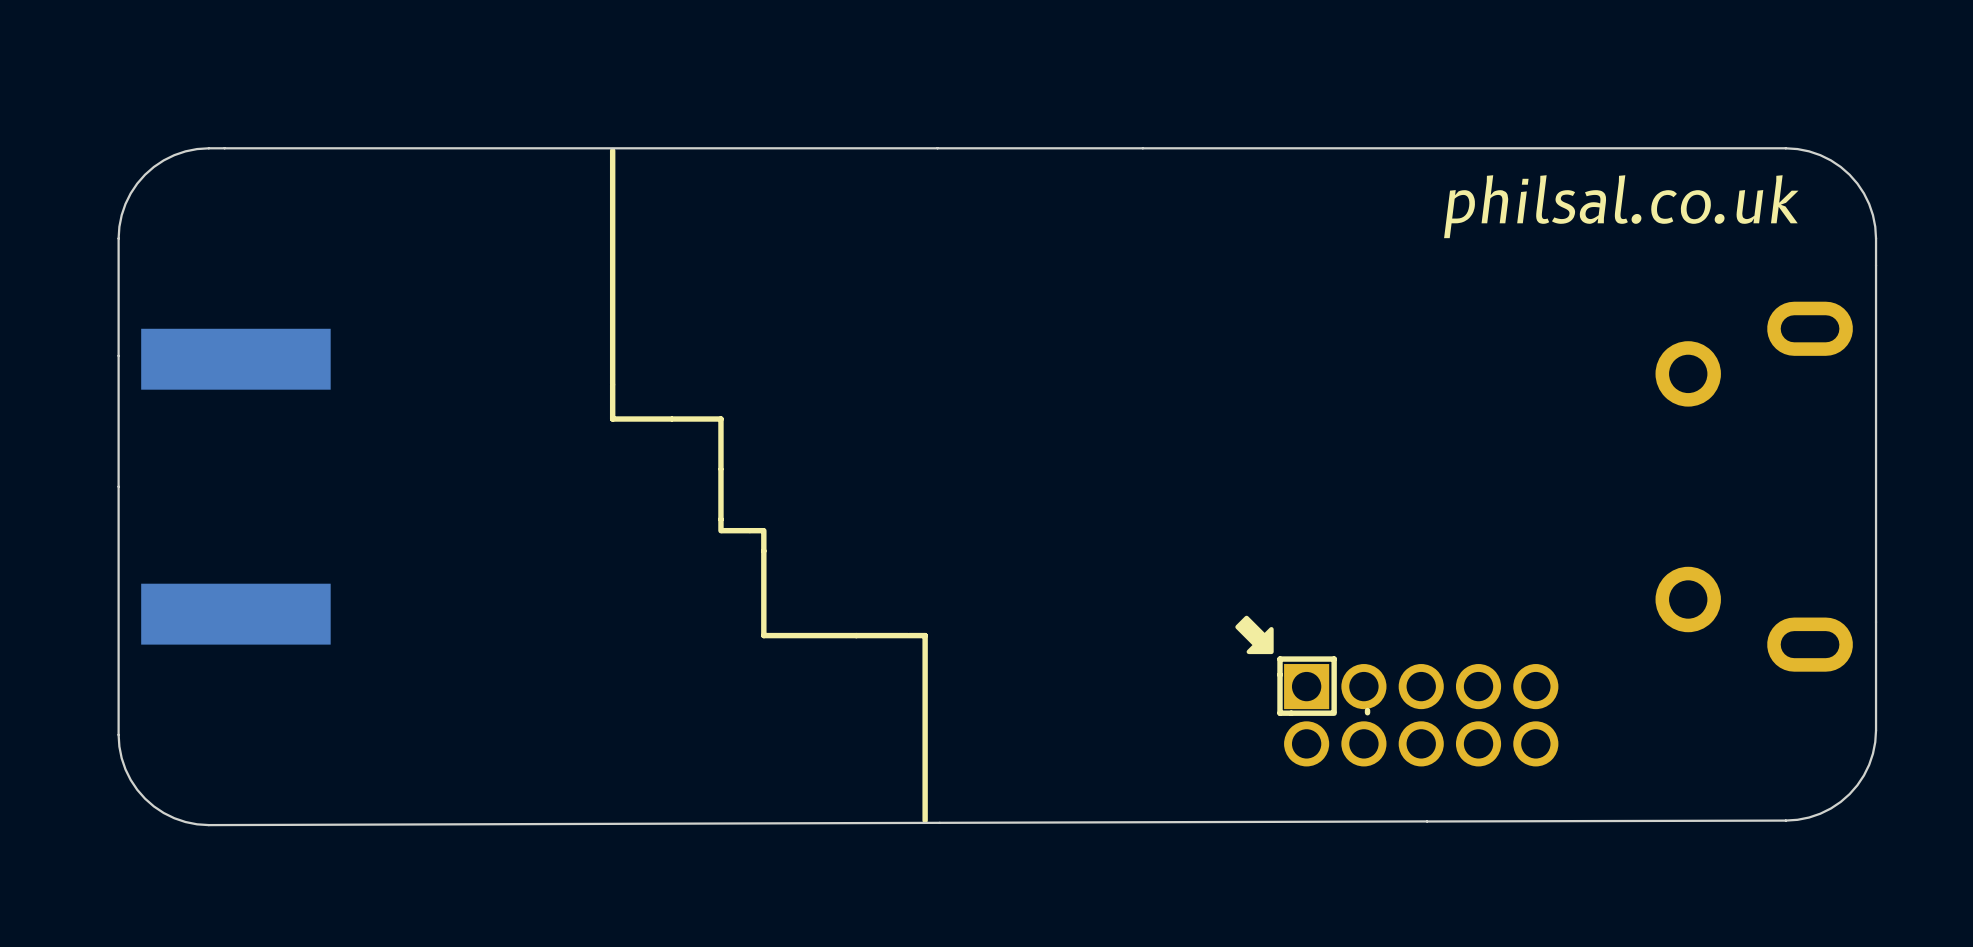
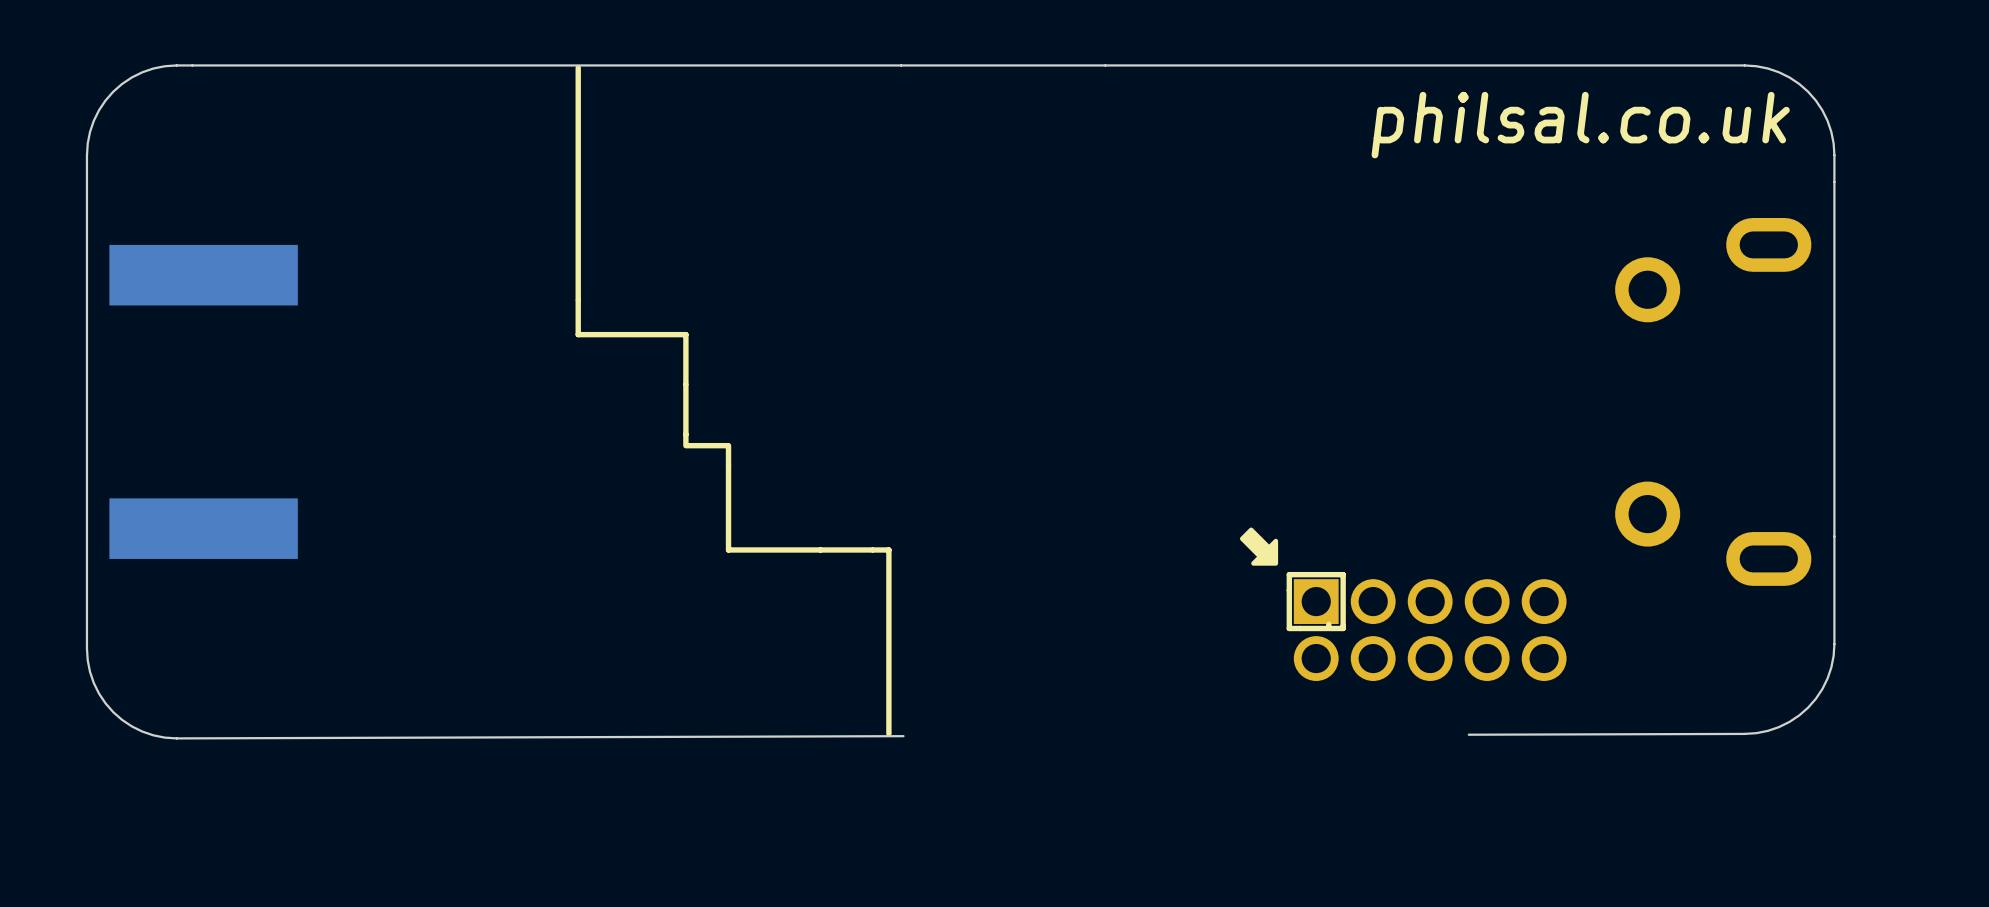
drawing position: (1254, 634) -> (1259, 546)
line: none -> (1343, 574) (1343, 628) (1289, 628) (1289, 574) (1343, 574)
line: (1334, 710) (1334, 659) (1280, 659) (1280, 713) (1334, 713) -> none
part position: (1421, 715) -> (1430, 630)
board edge: (1785, 820) (939, 822) -> (1744, 733) (1468, 734)

